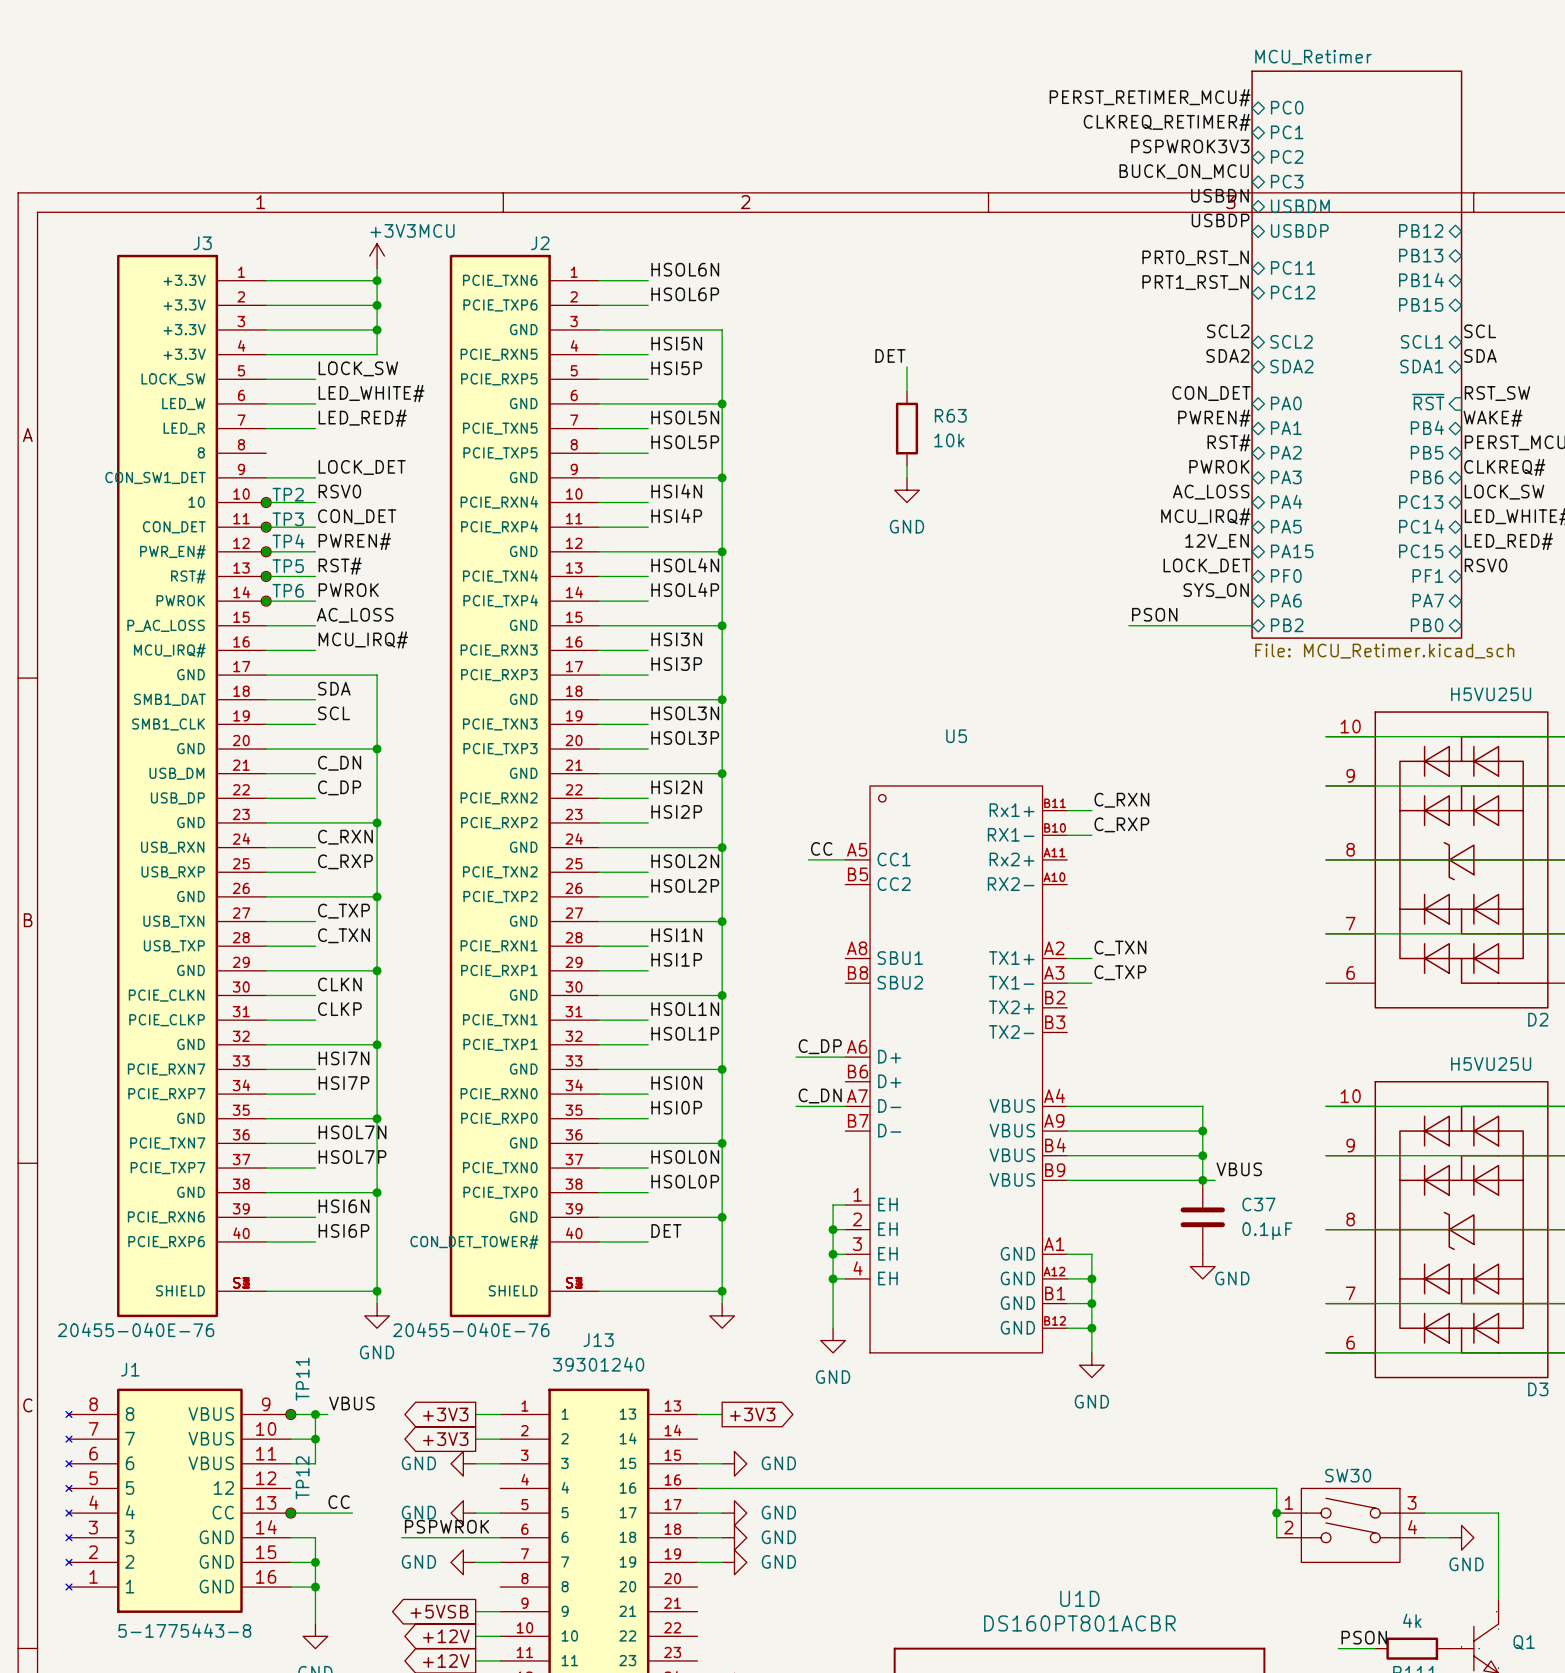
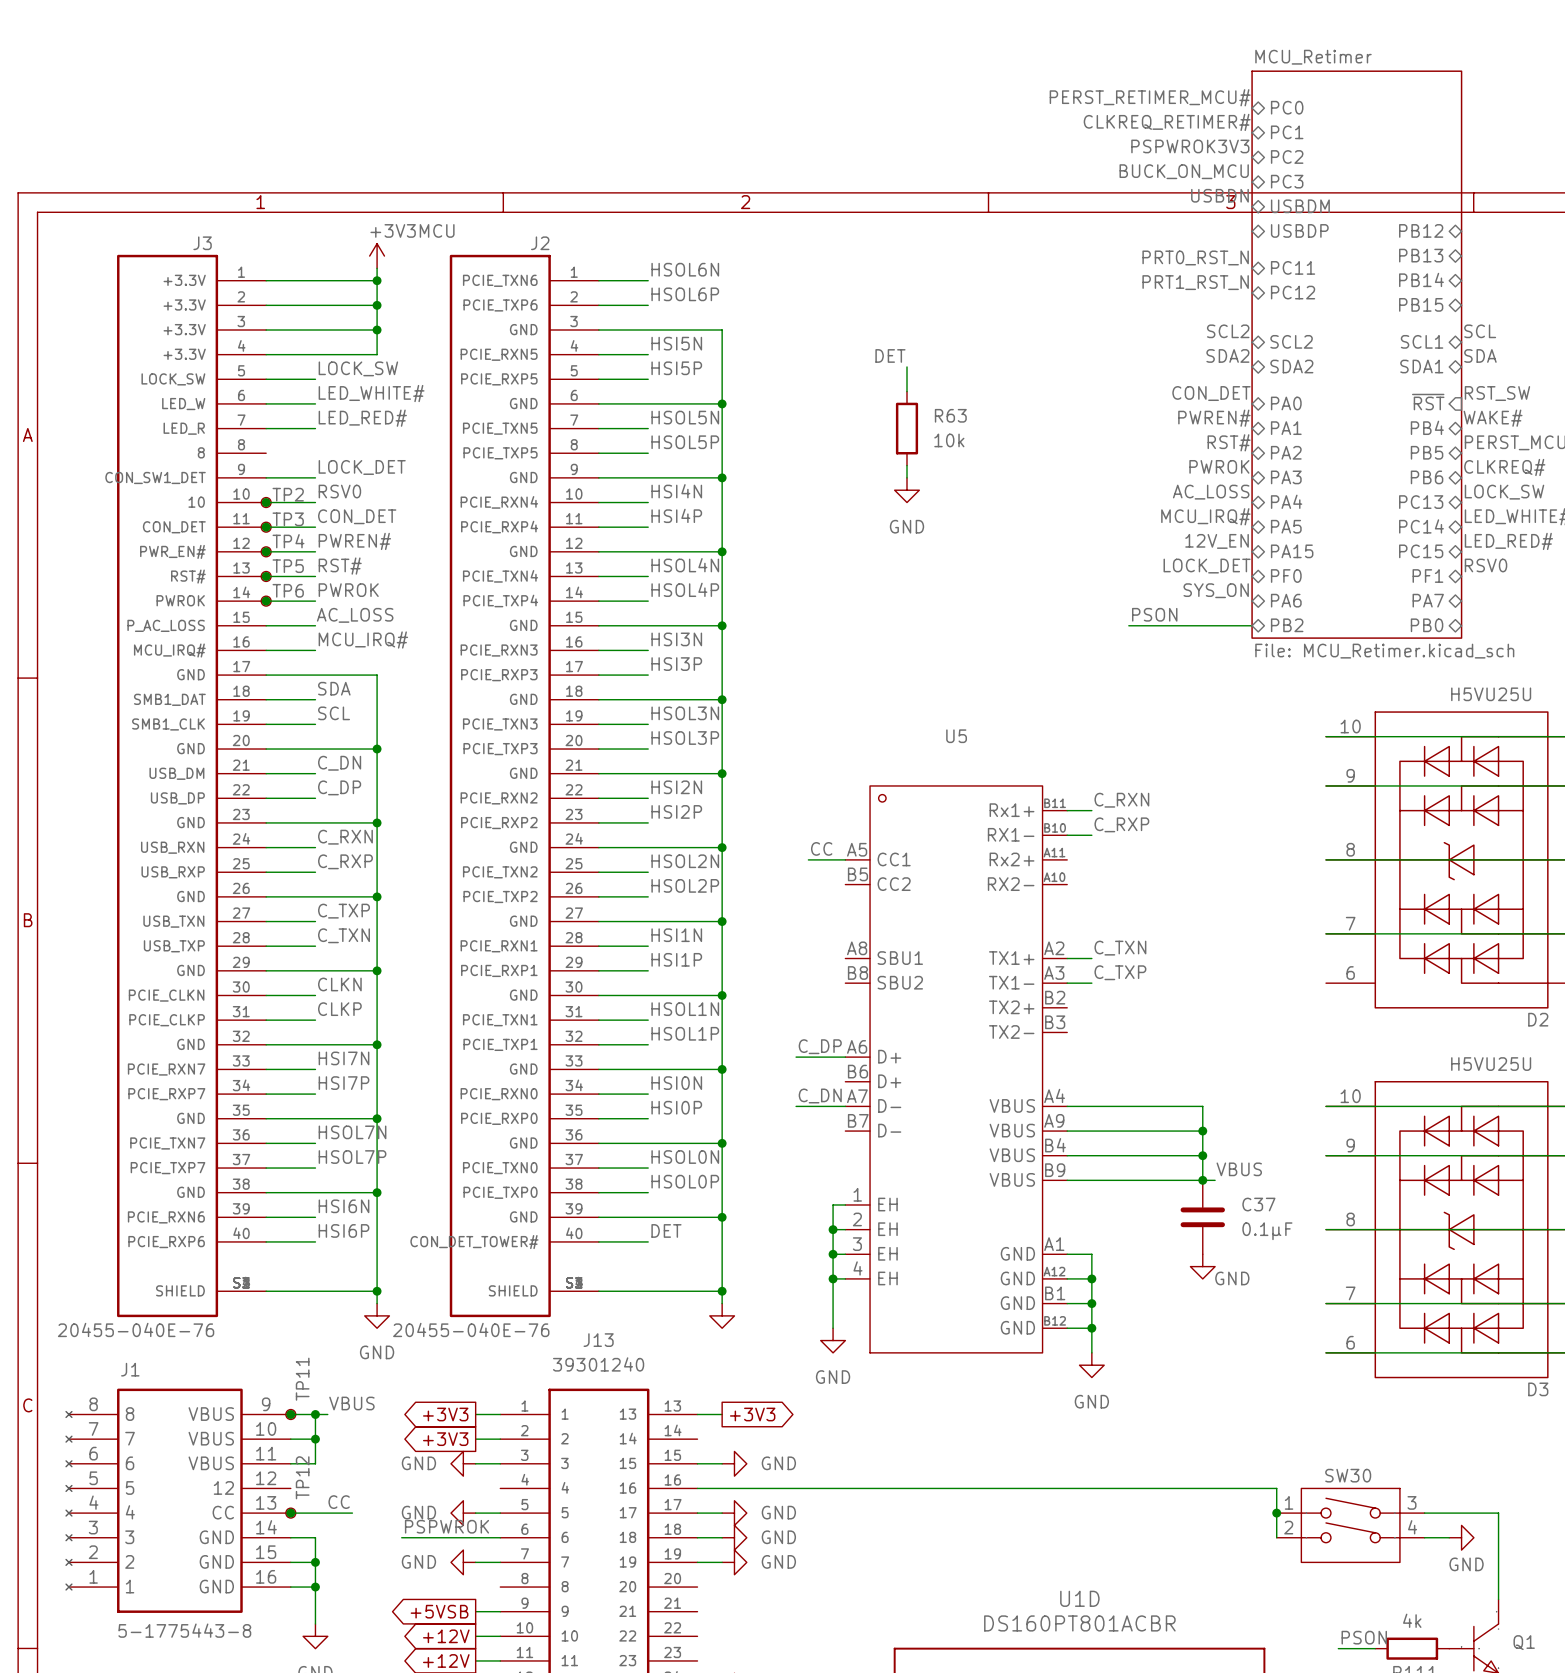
label: USBDP (1220, 220) -> none

